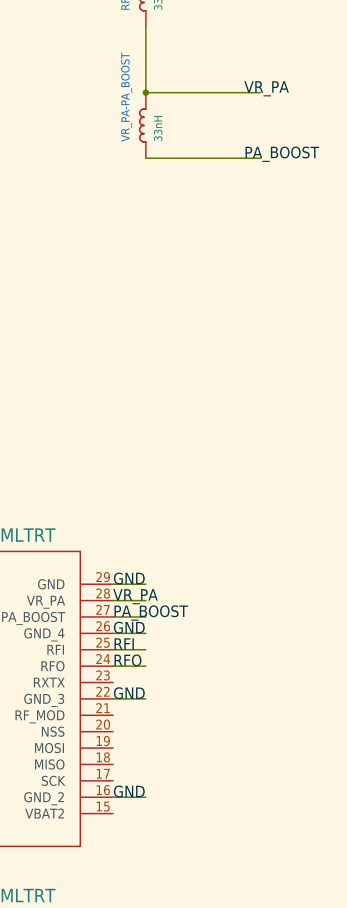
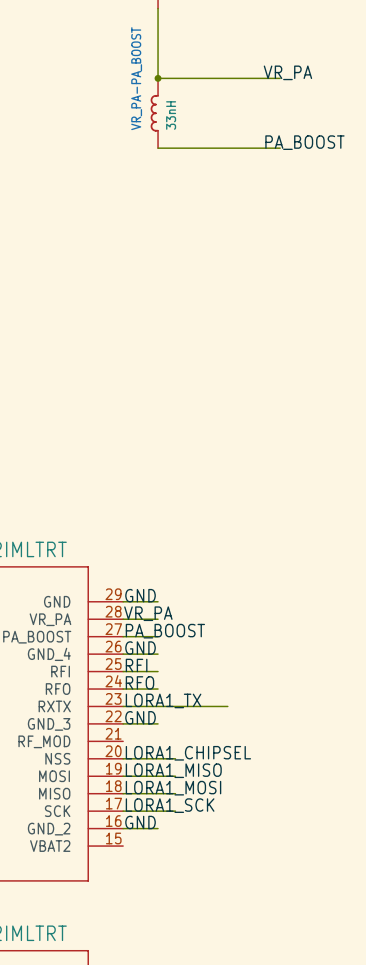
label: none -> LORA1_TX (163, 700)
wire: none -> (123, 706) (227, 706)
label: none -> LORA1_CHIPSEL (188, 753)
wire: none -> (123, 758) (175, 758)
label: none -> LORA1_MISO (173, 770)
wire: none -> (123, 776) (175, 776)
label: none -> LORA1_MOSI (173, 788)
wire: none -> (123, 793) (175, 793)
label: none -> LORA1_SCK (170, 805)
wire: none -> (123, 811) (175, 811)

